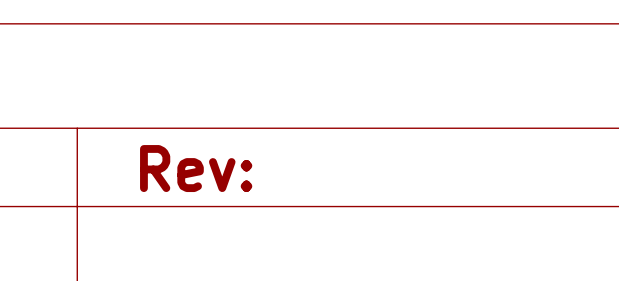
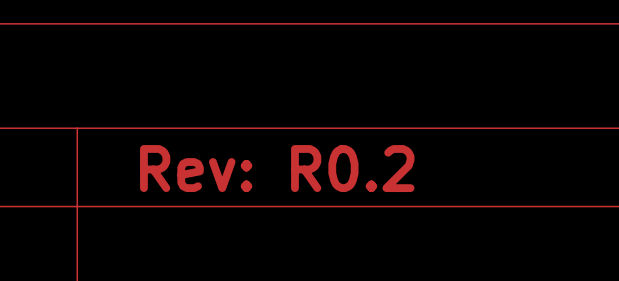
title block: Rev: (196, 168) -> Rev: R0.2 (277, 168)

